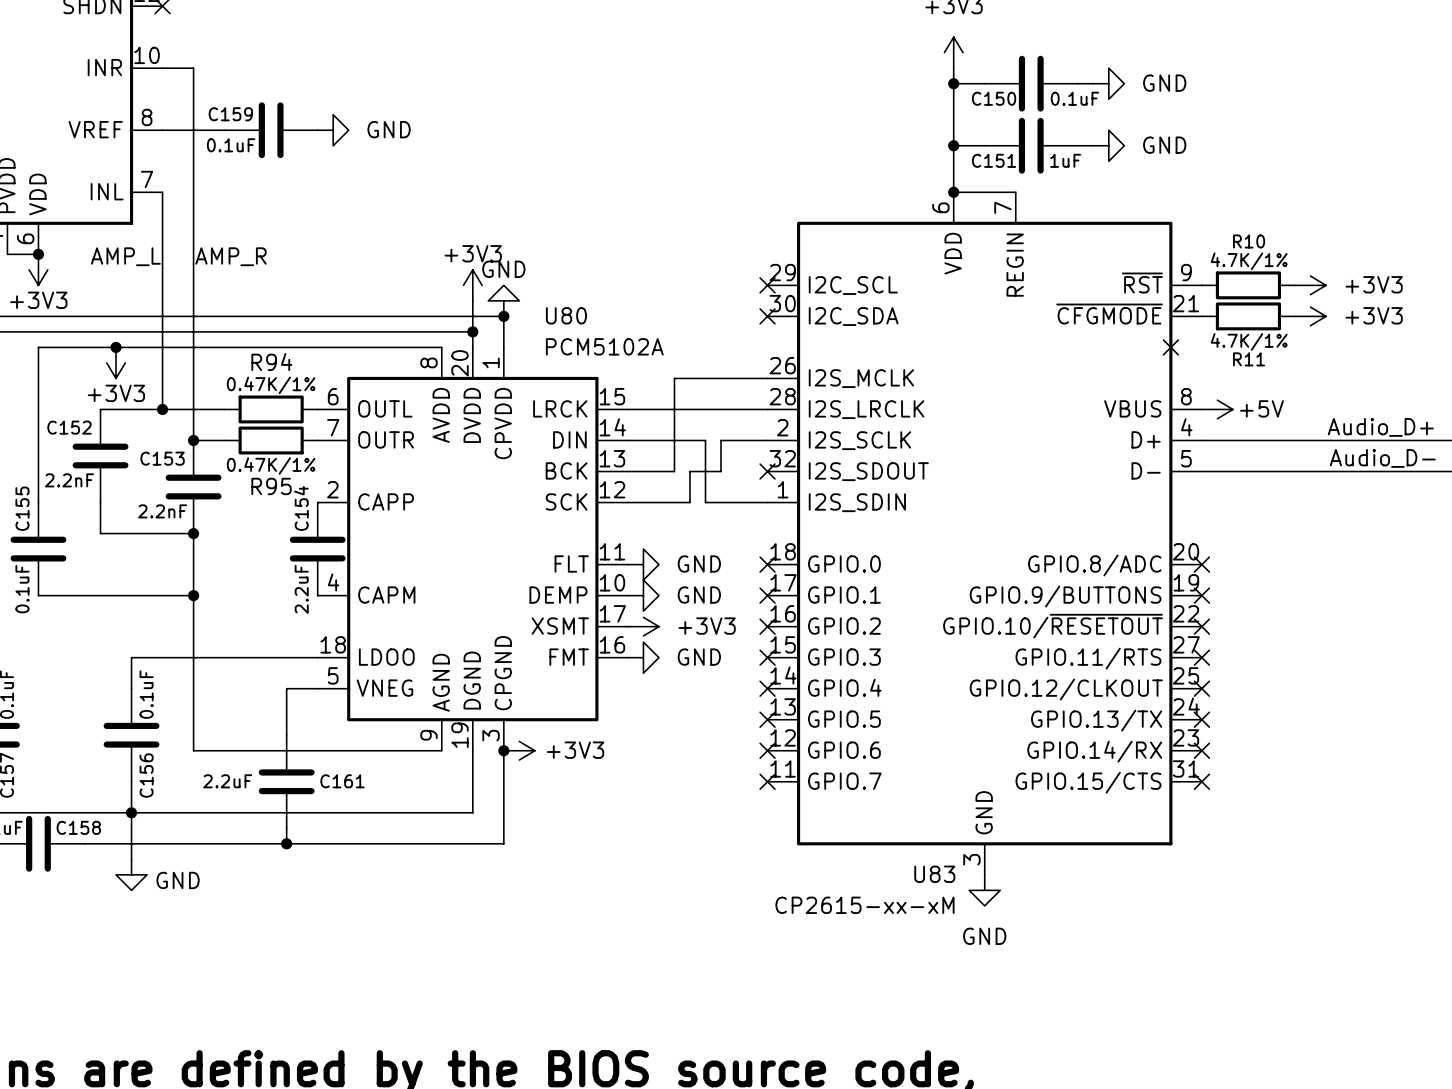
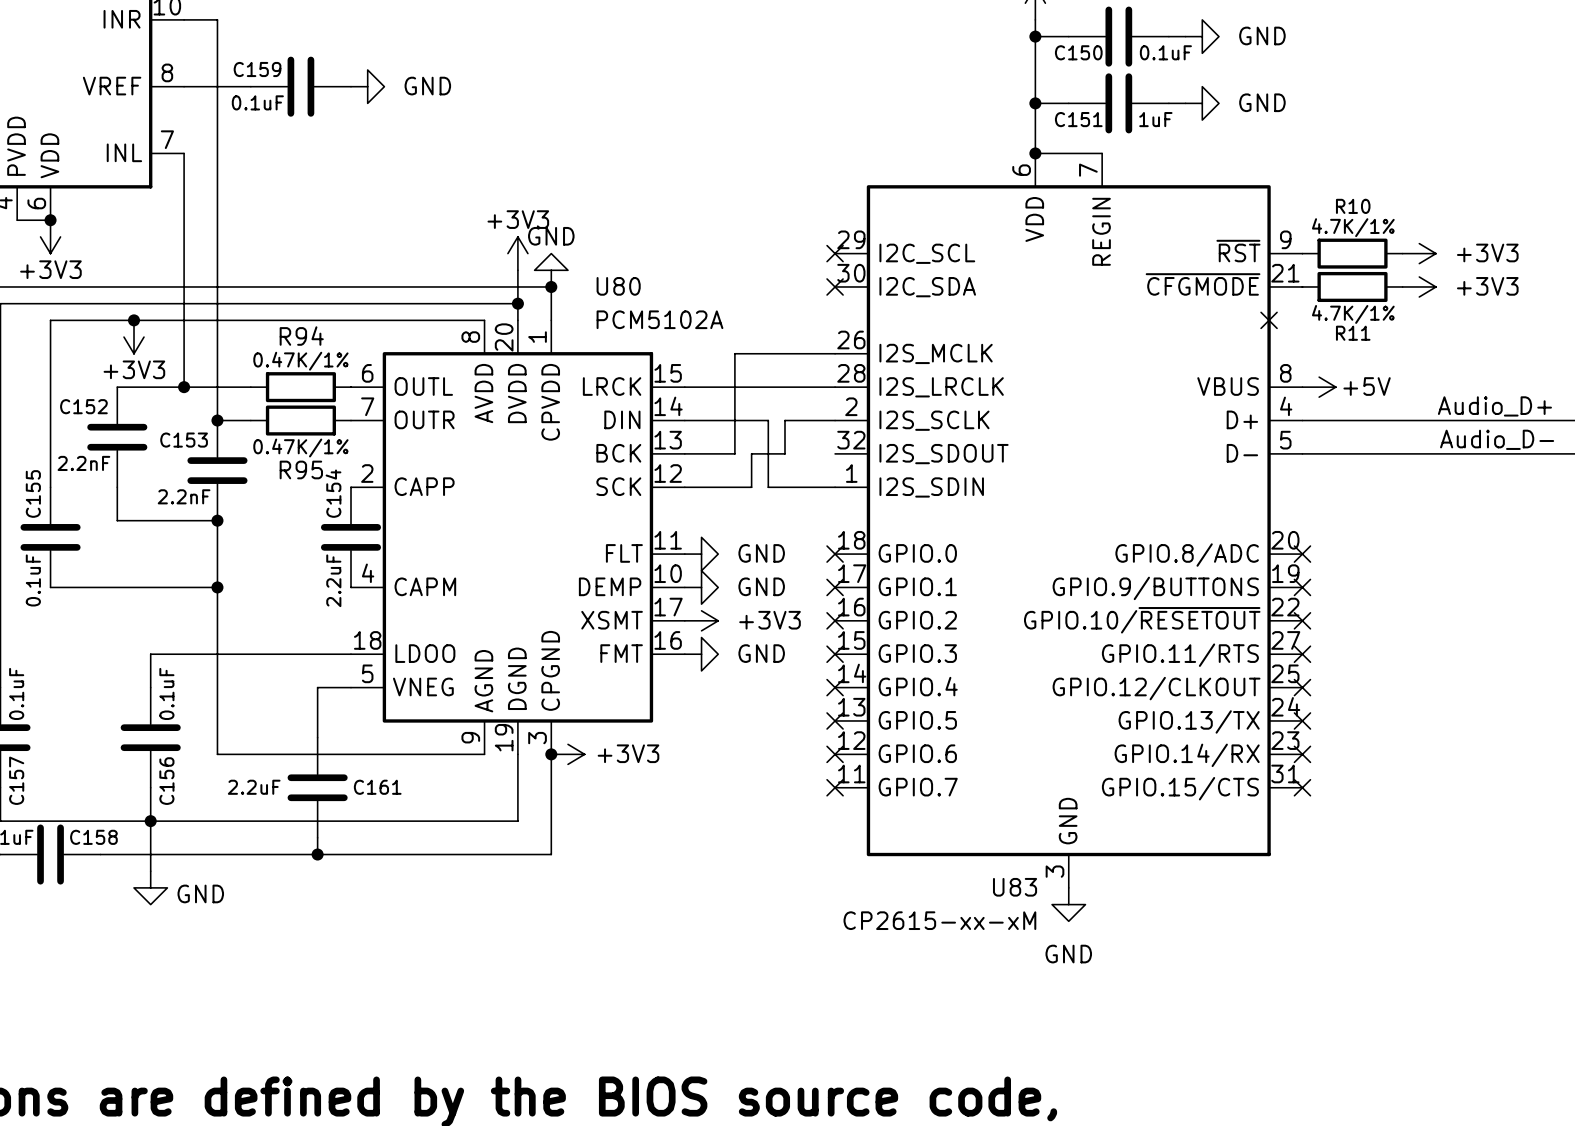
label: AMP_L (125, 256) -> none
label: AMP_R (231, 256) -> none
no-connect mark: (767, 471) -> none

